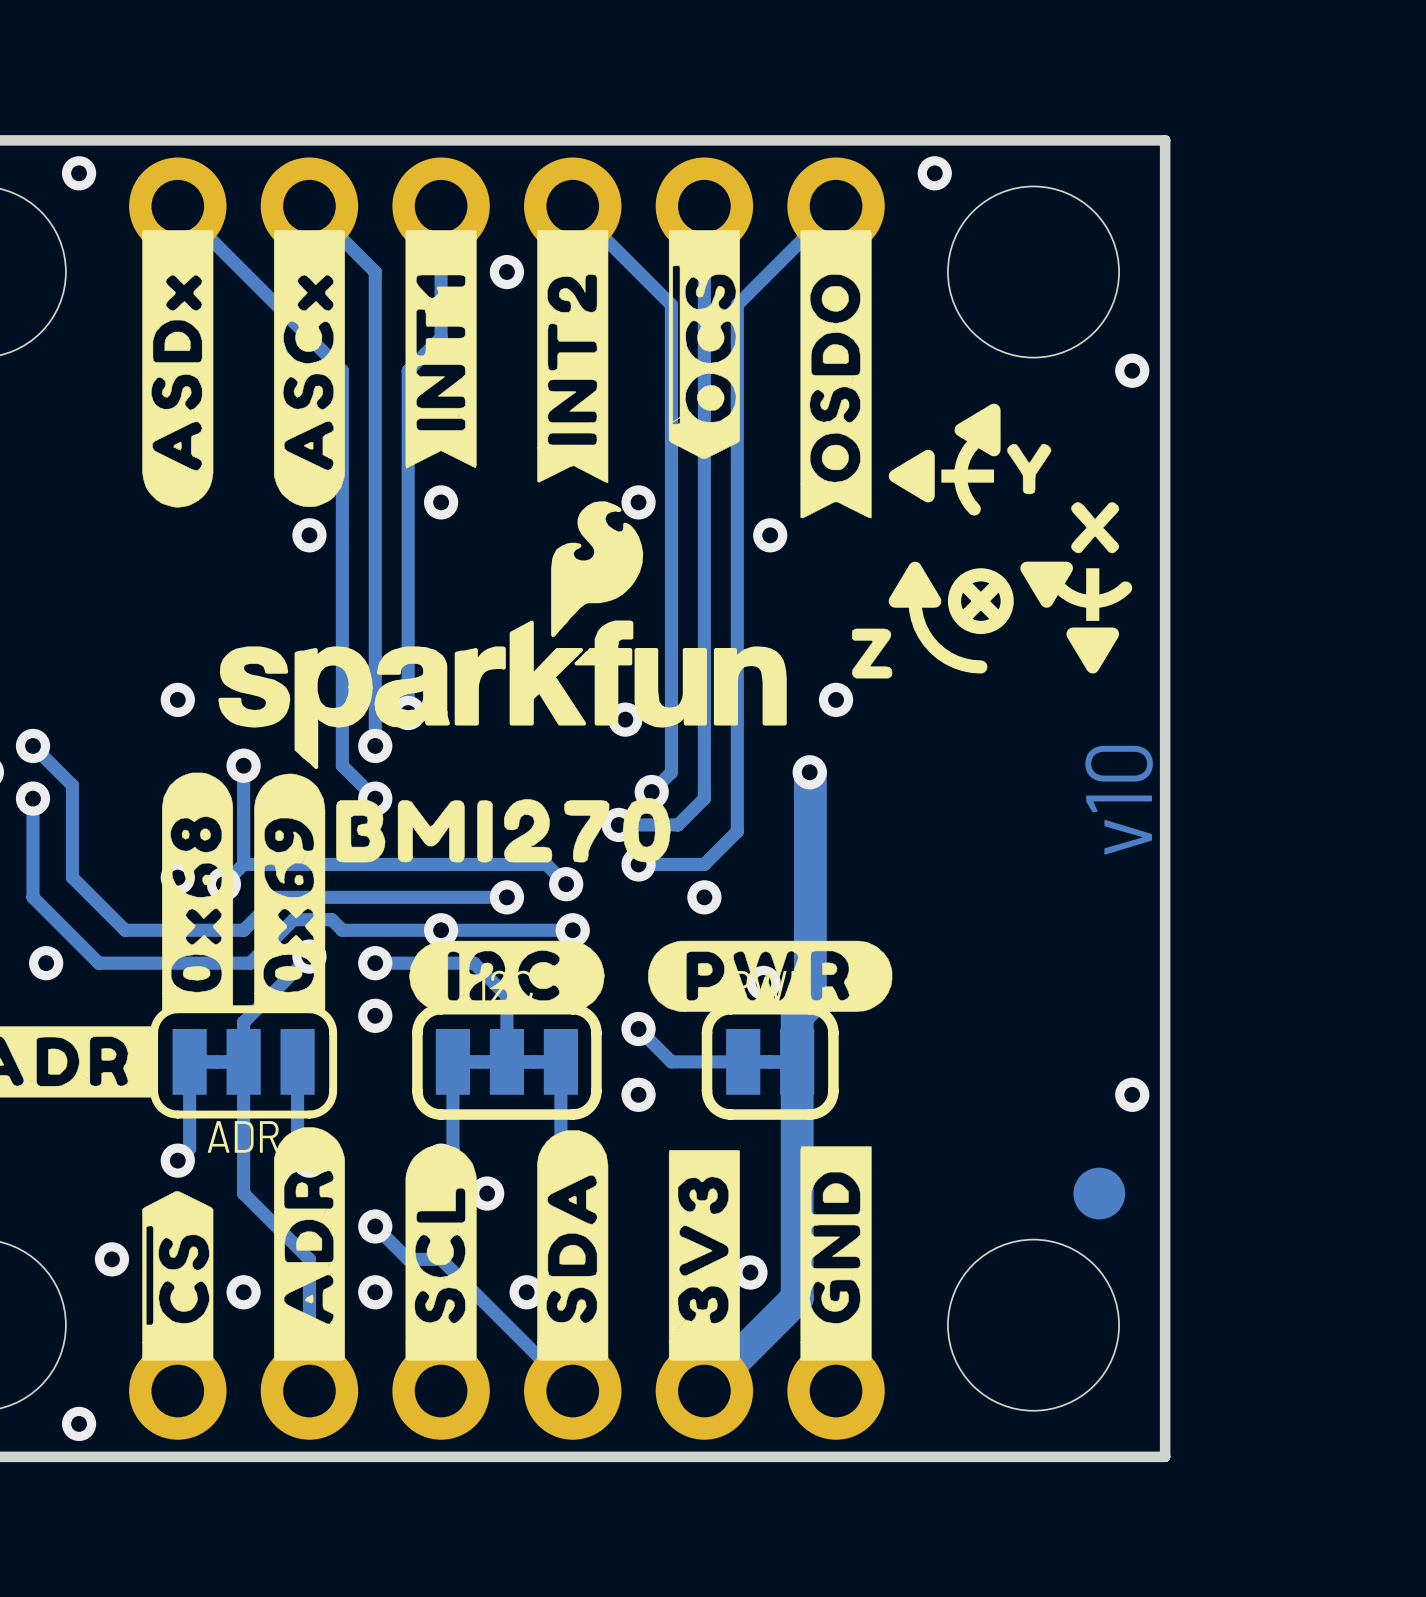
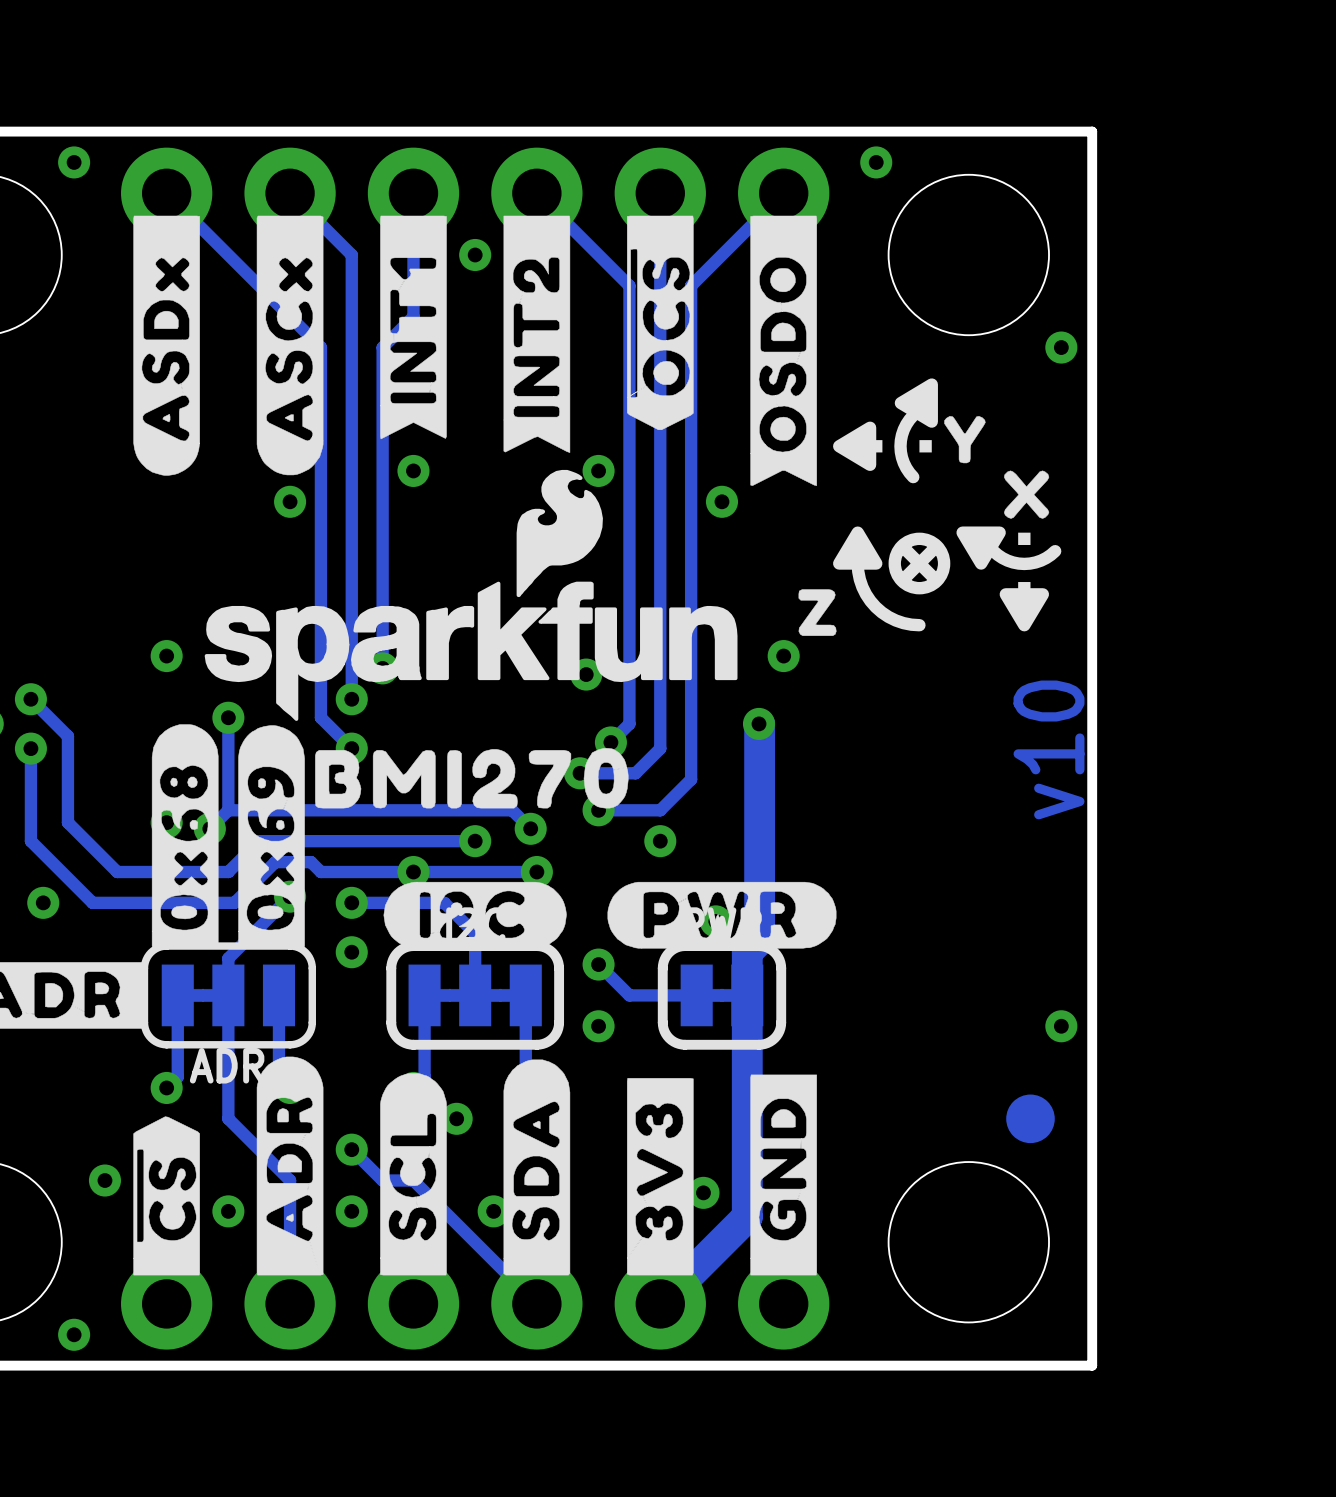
line: (980, 476) (941, 476) -> none
line: (1092, 581) (1092, 620) -> none

